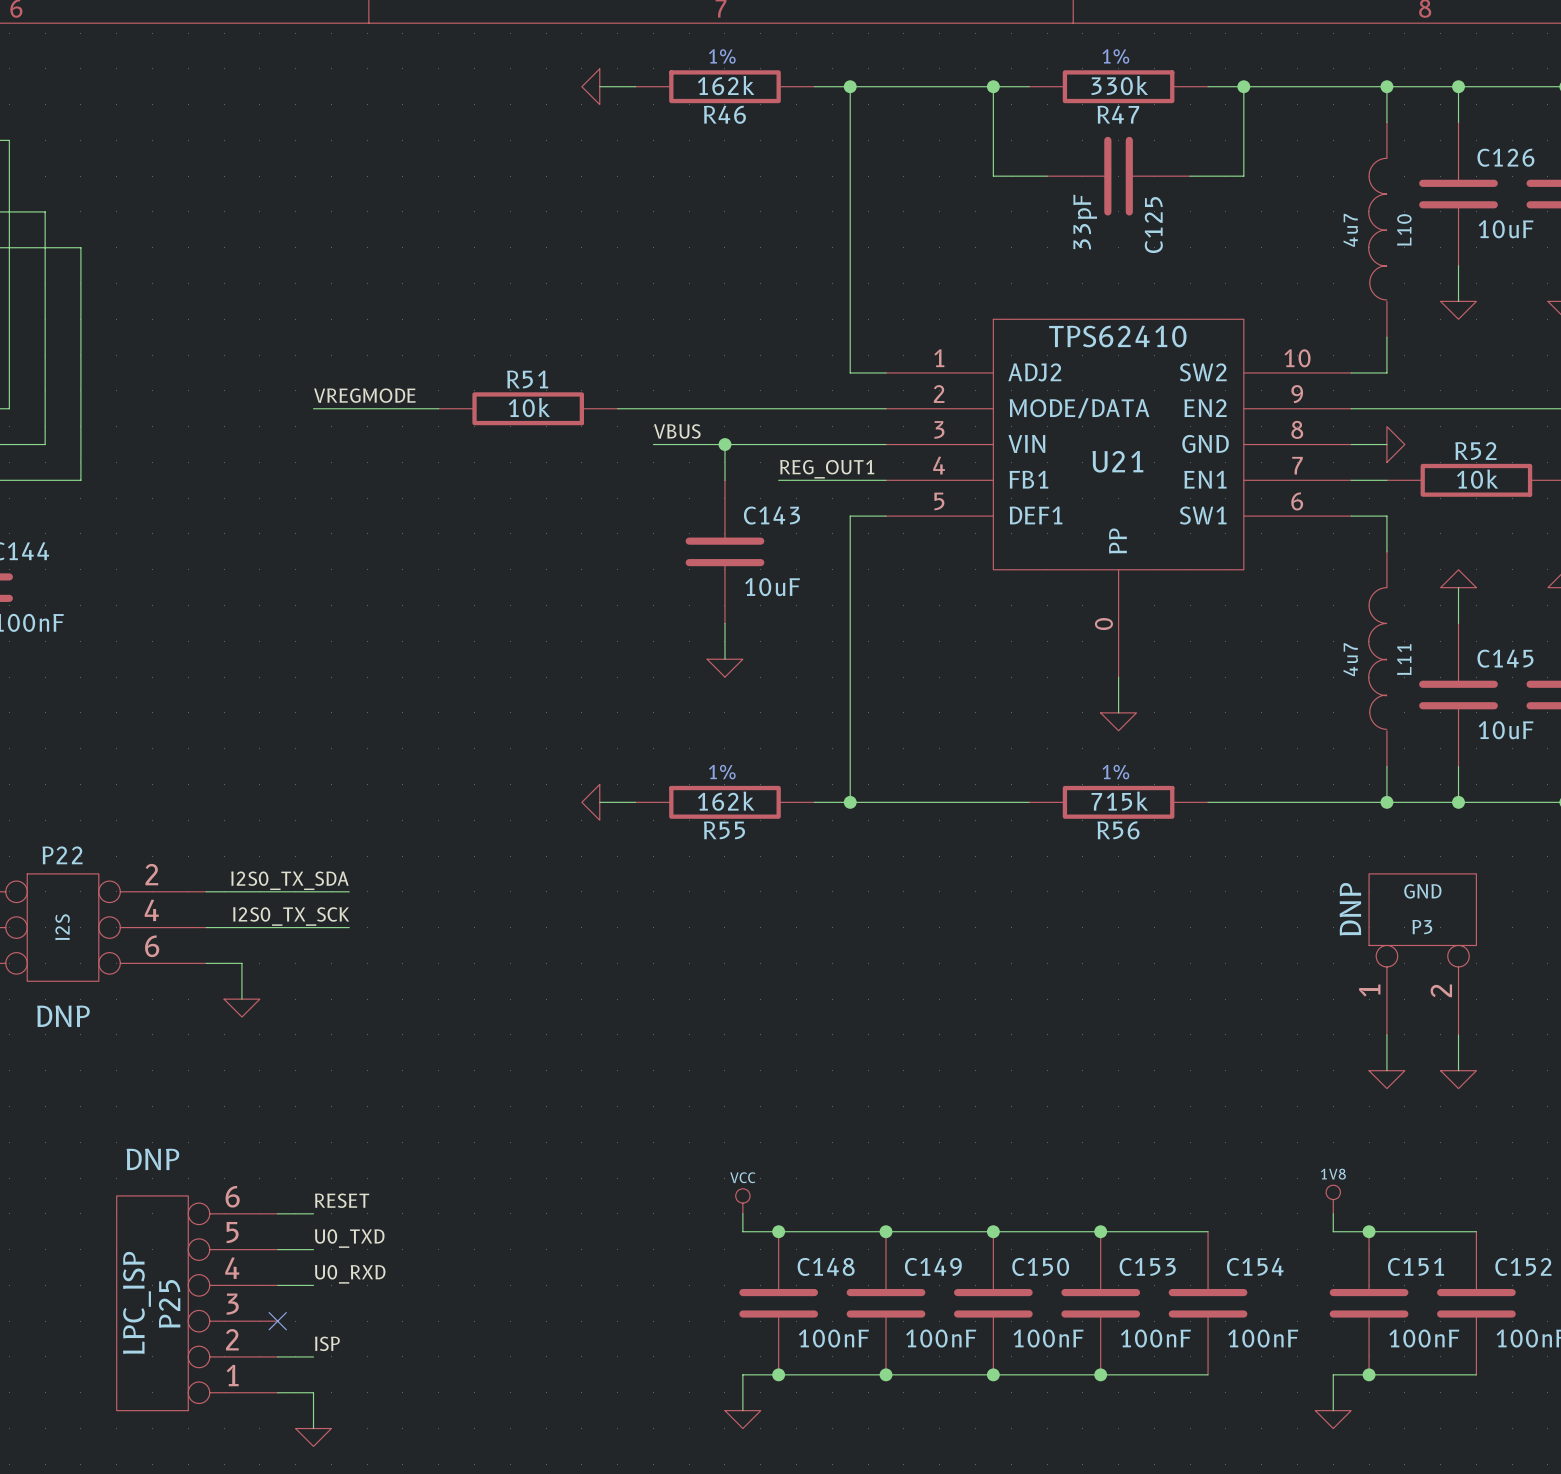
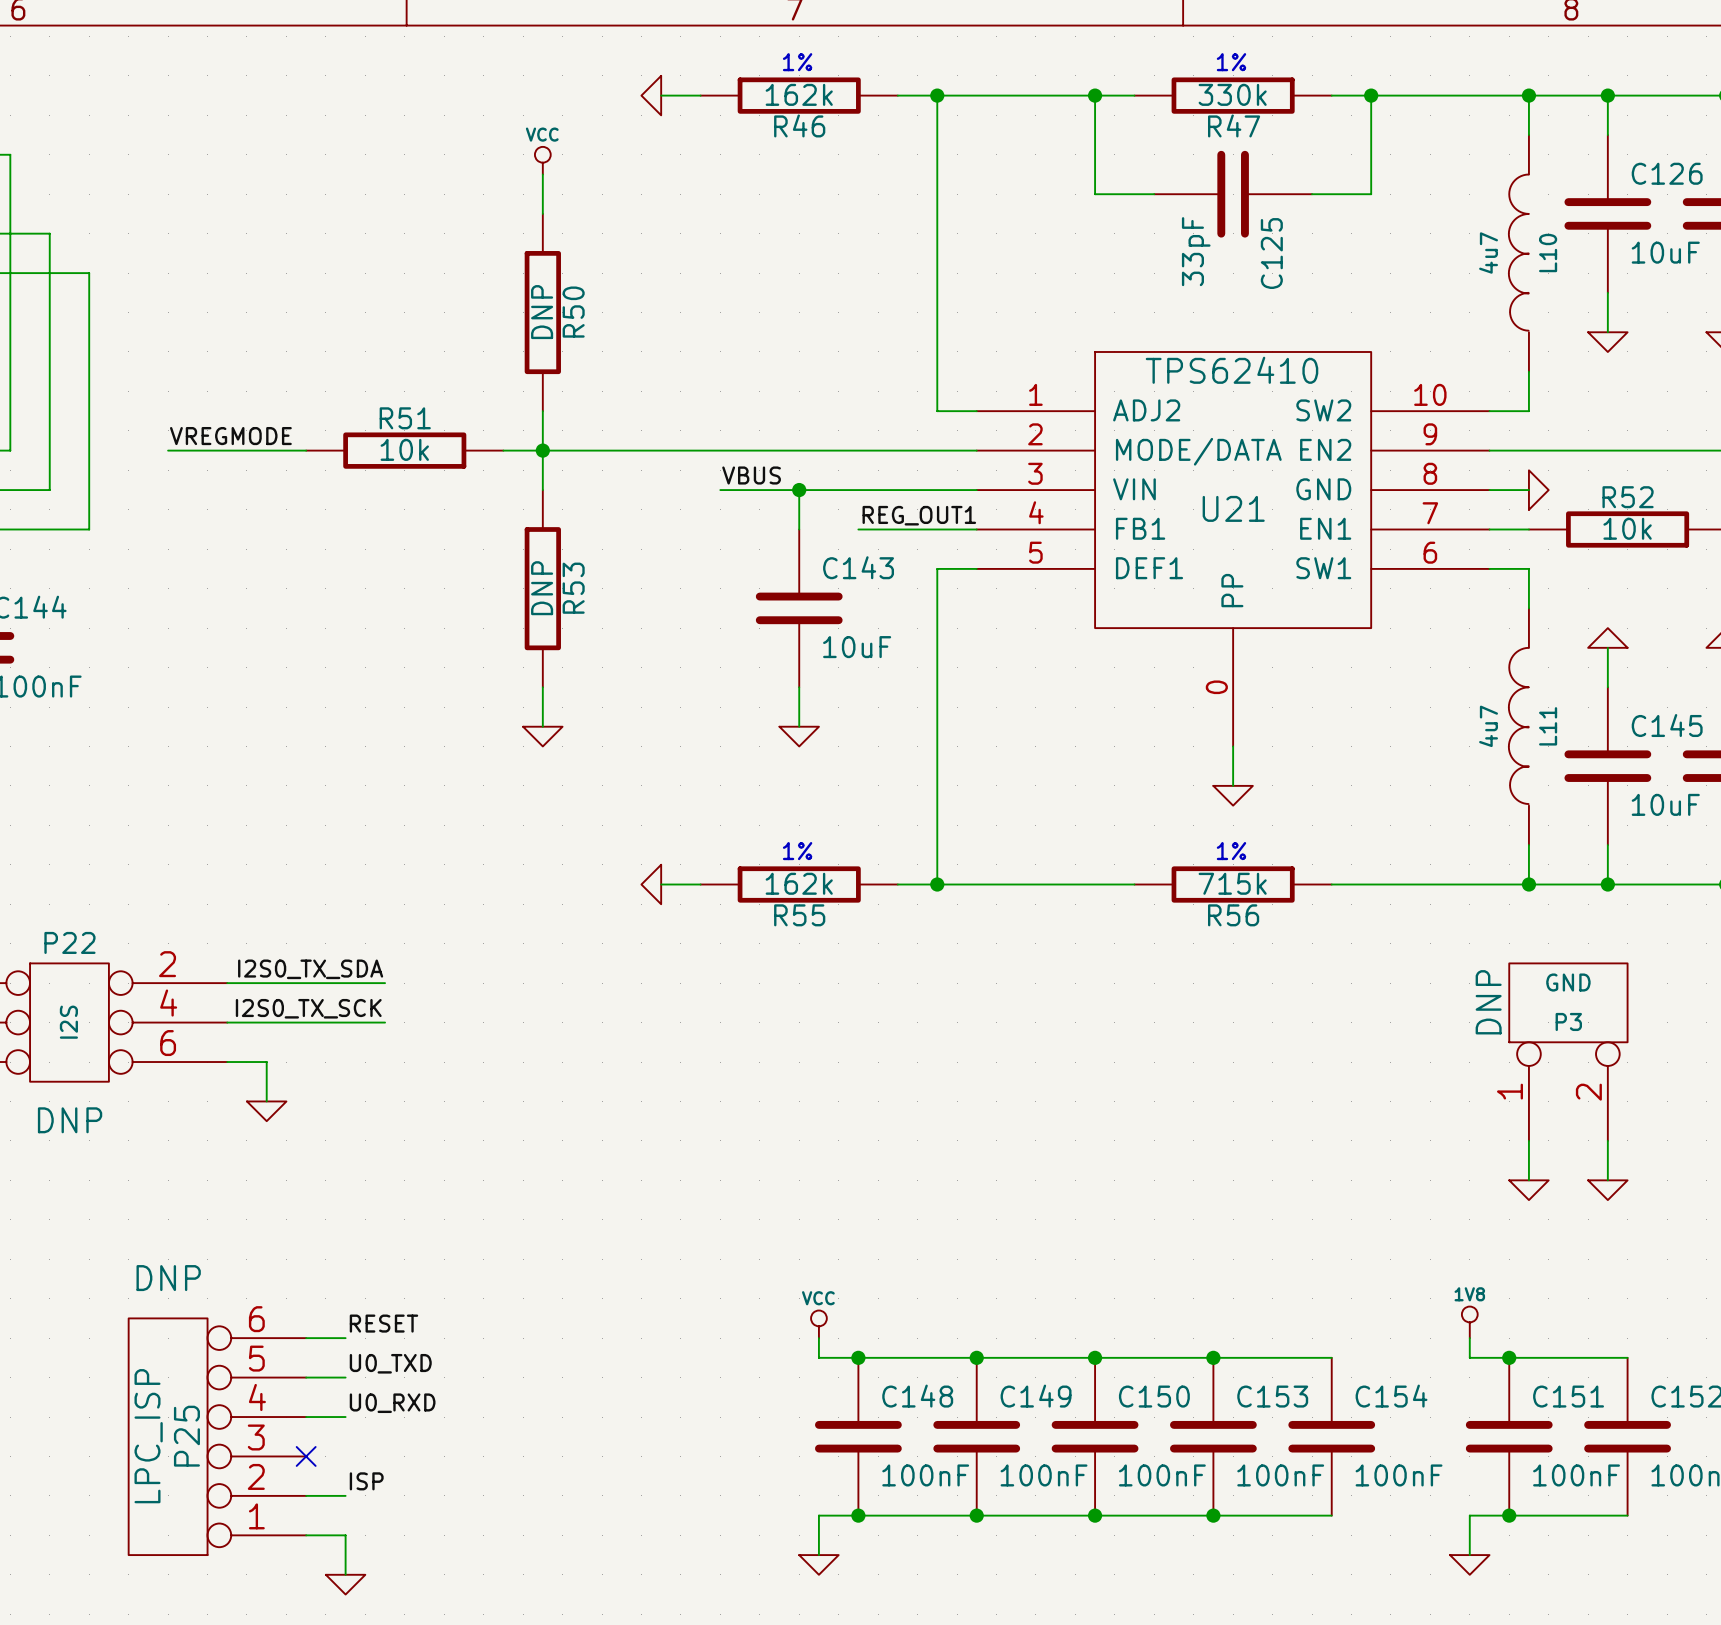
power symbol: none -> VCC (542, 160)
wire: none -> (542, 174) (542, 213)
R50: none -> DNP (542, 312)
wire: none -> (542, 411) (542, 490)
label position: VREGMODE (364, 395) -> VREGMODE (230, 436)
wire: (313, 408) (438, 408) -> (168, 450) (306, 450)
wire: none -> (503, 450) (680, 450)
junction: none -> (542, 450)
R51 position: (528, 408) -> (404, 450)
R53: none -> DNP (542, 588)
wire: none -> (542, 687) (542, 726)
power symbol: none -> (542, 736)

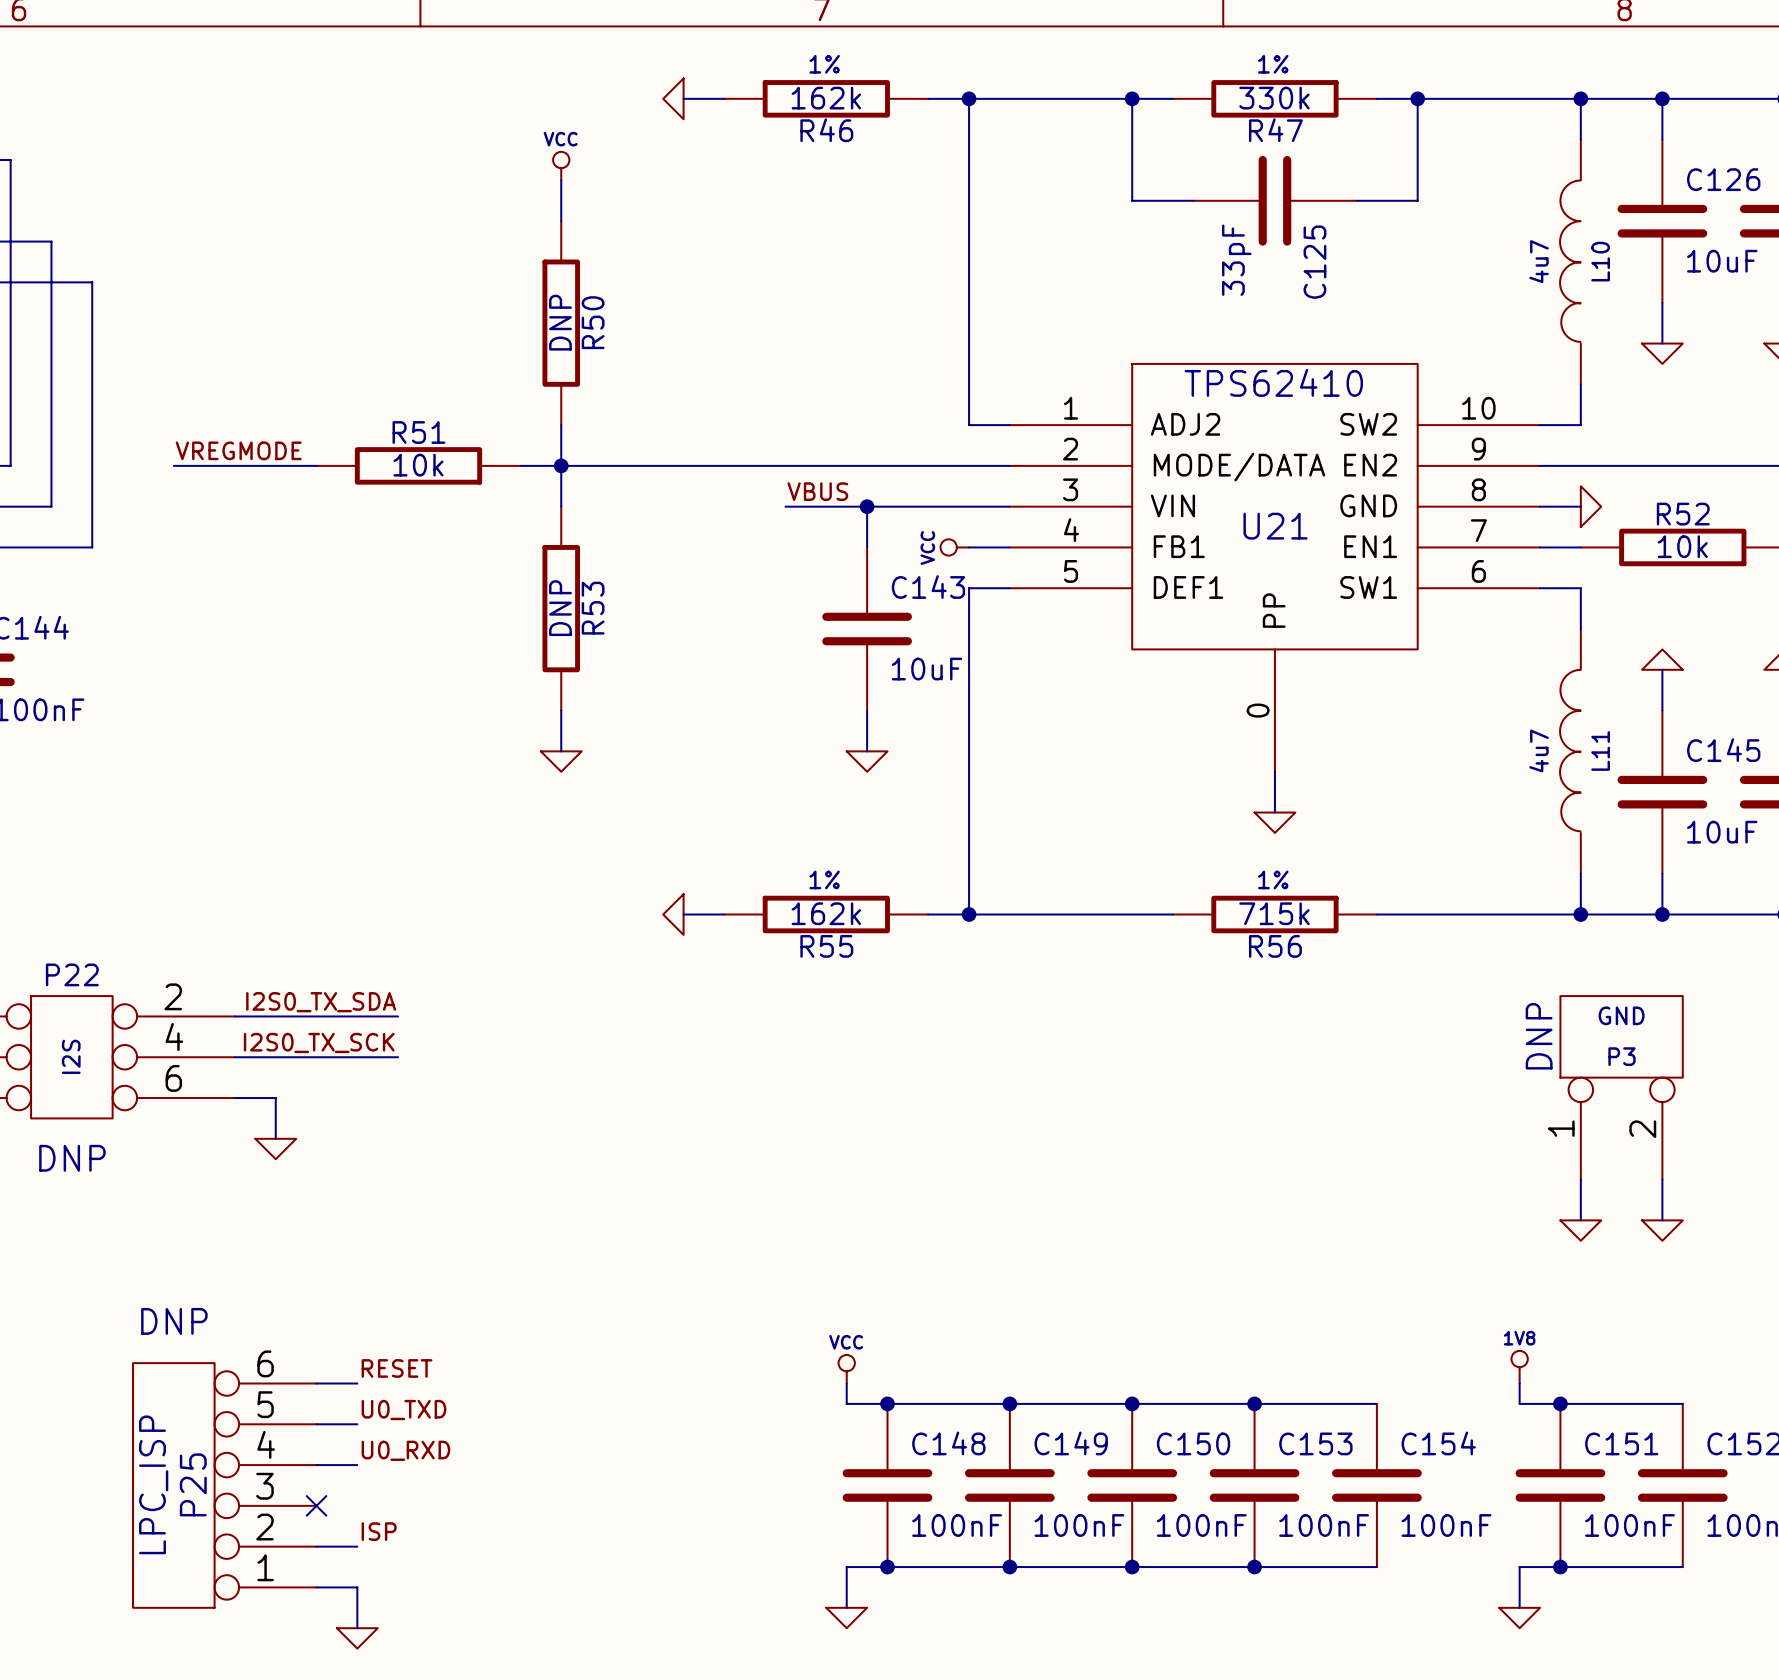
label position: VBUS (751, 475) -> VBUS (817, 491)
wire: (720, 490) (759, 490) -> none
wire: (799, 490) (799, 529) -> (867, 506) (867, 547)
junction position: (799, 490) -> (867, 506)
label: REG_OUT1 (919, 515) -> none
wire: (858, 529) (937, 529) -> none
power symbol: none -> VCC (954, 547)
C143 position: (799, 608) -> (867, 629)
wire: (799, 687) (799, 726) -> (867, 710) (867, 751)
power symbol position: (799, 736) -> (867, 761)

